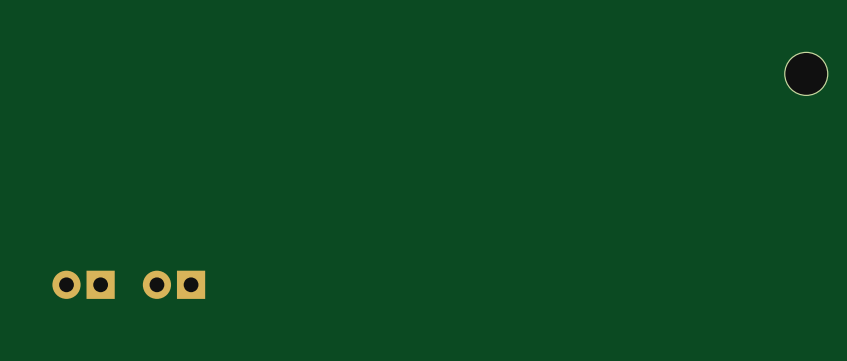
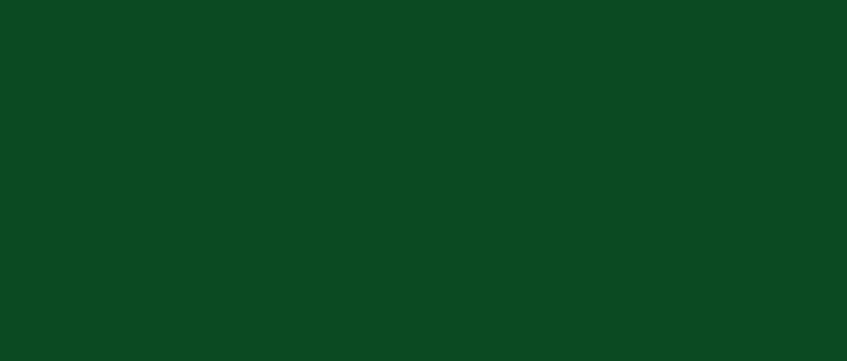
part: (806, 73) -> none
part: (83, 284) -> none
part: (174, 284) -> none

